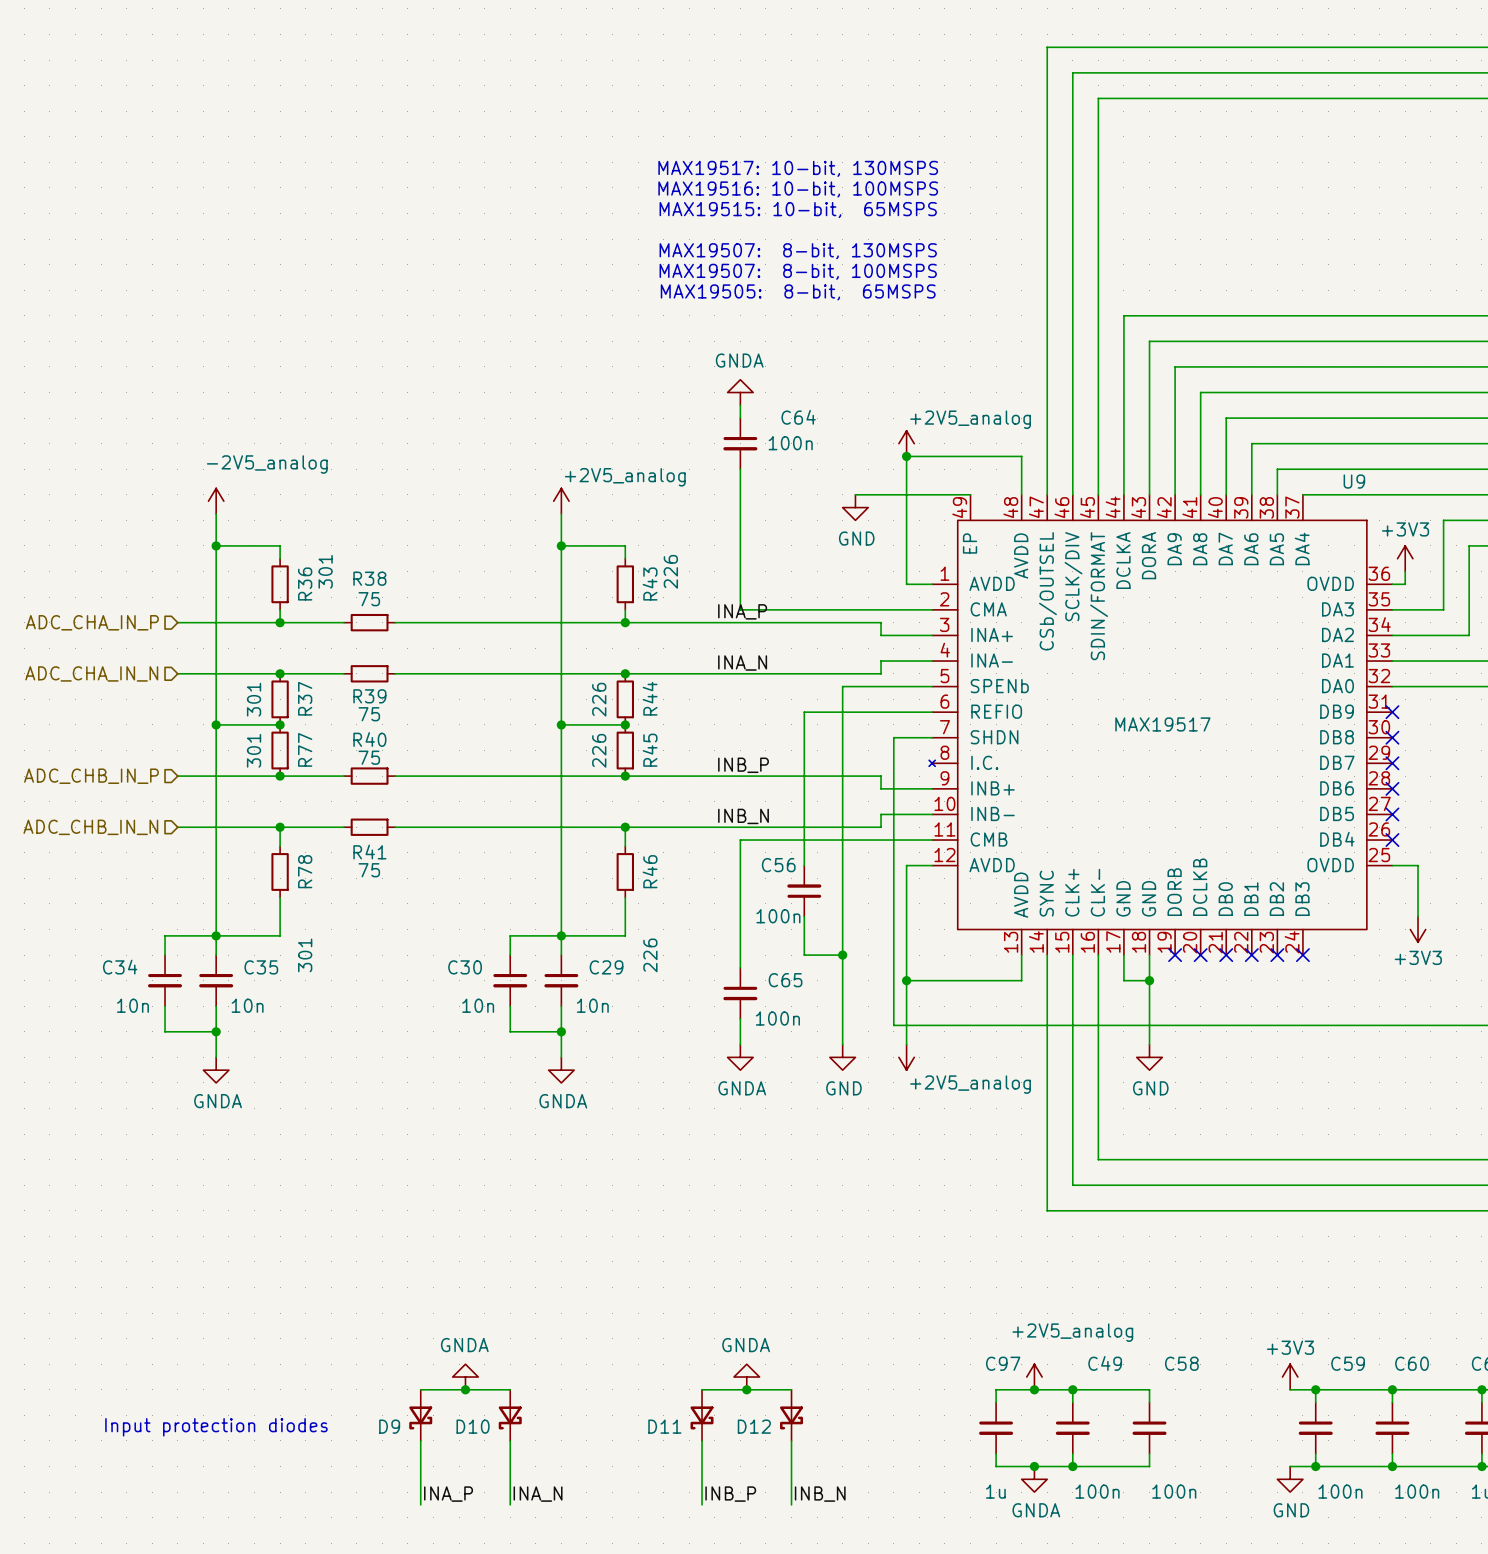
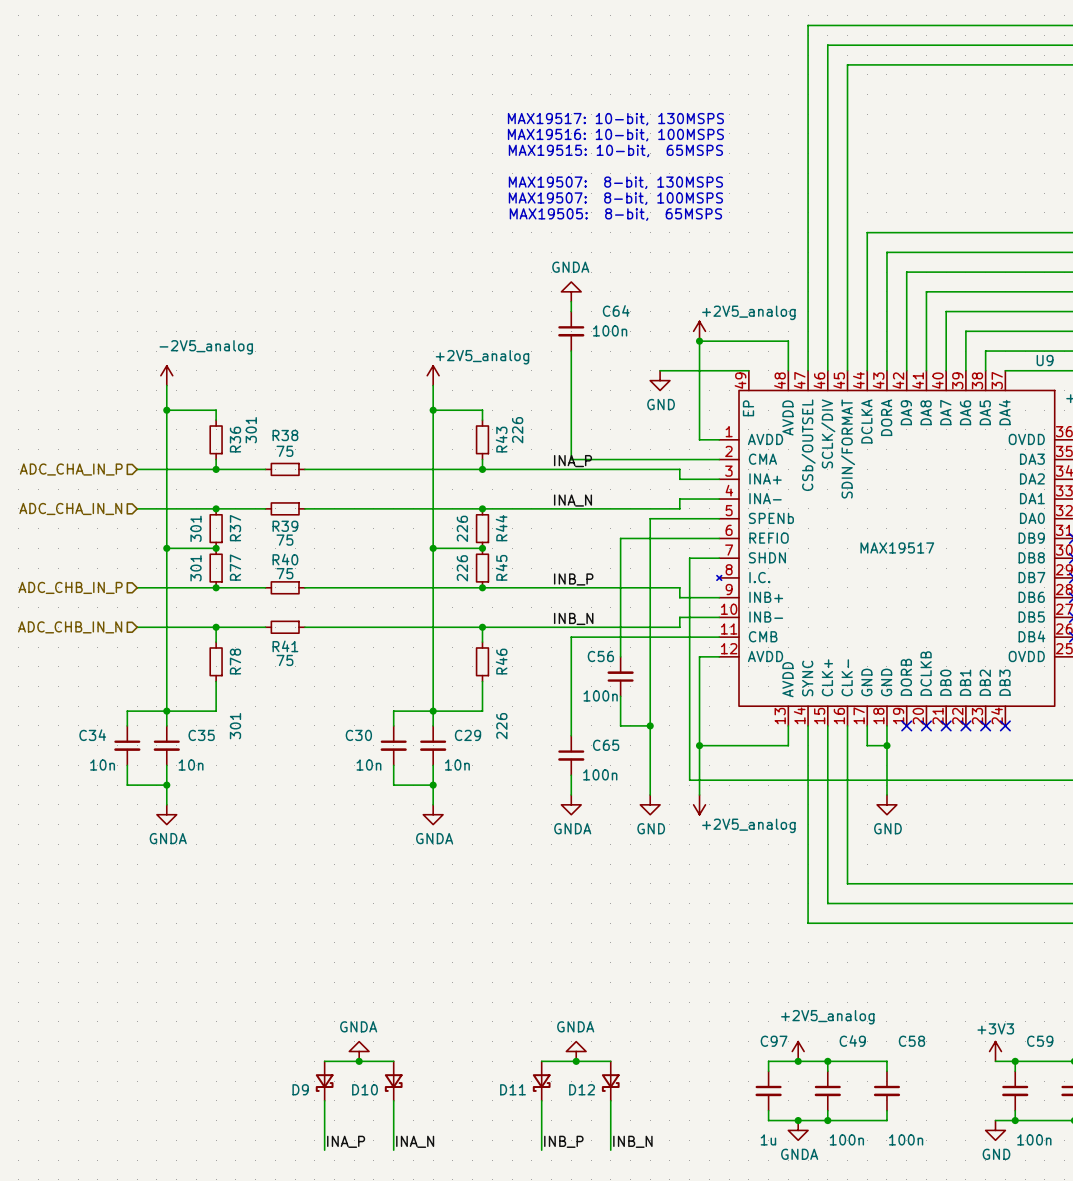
text: Input protection diodes (216, 1427) -> none

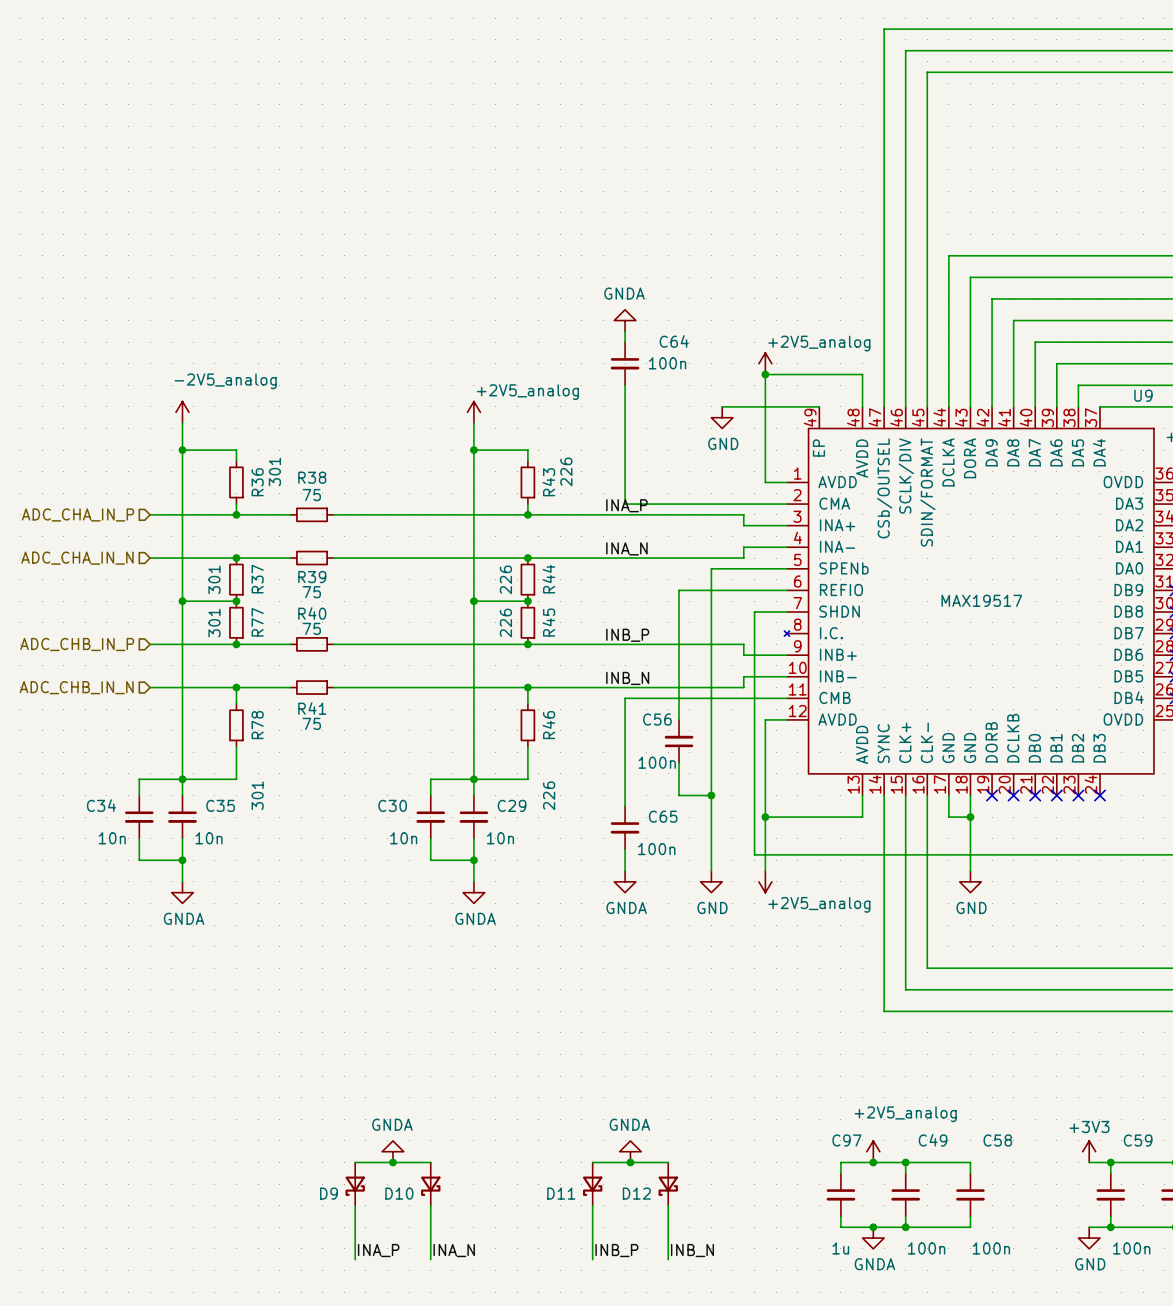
text: MAX19517: 10-bit, 130MSPS (615, 119) -> none
text: MAX19516: 10-bit, 100MSPS (615, 135) -> none
text: MAX19515: 10-bit, 65MSPS (615, 151) -> none
text: MAX19507: 8-bit, 130MSPS (615, 182) -> none
text: MAX19507: 8-bit, 100MSPS (615, 198) -> none
text: MAX19505: 8-bit, 65MSPS (615, 214) -> none

